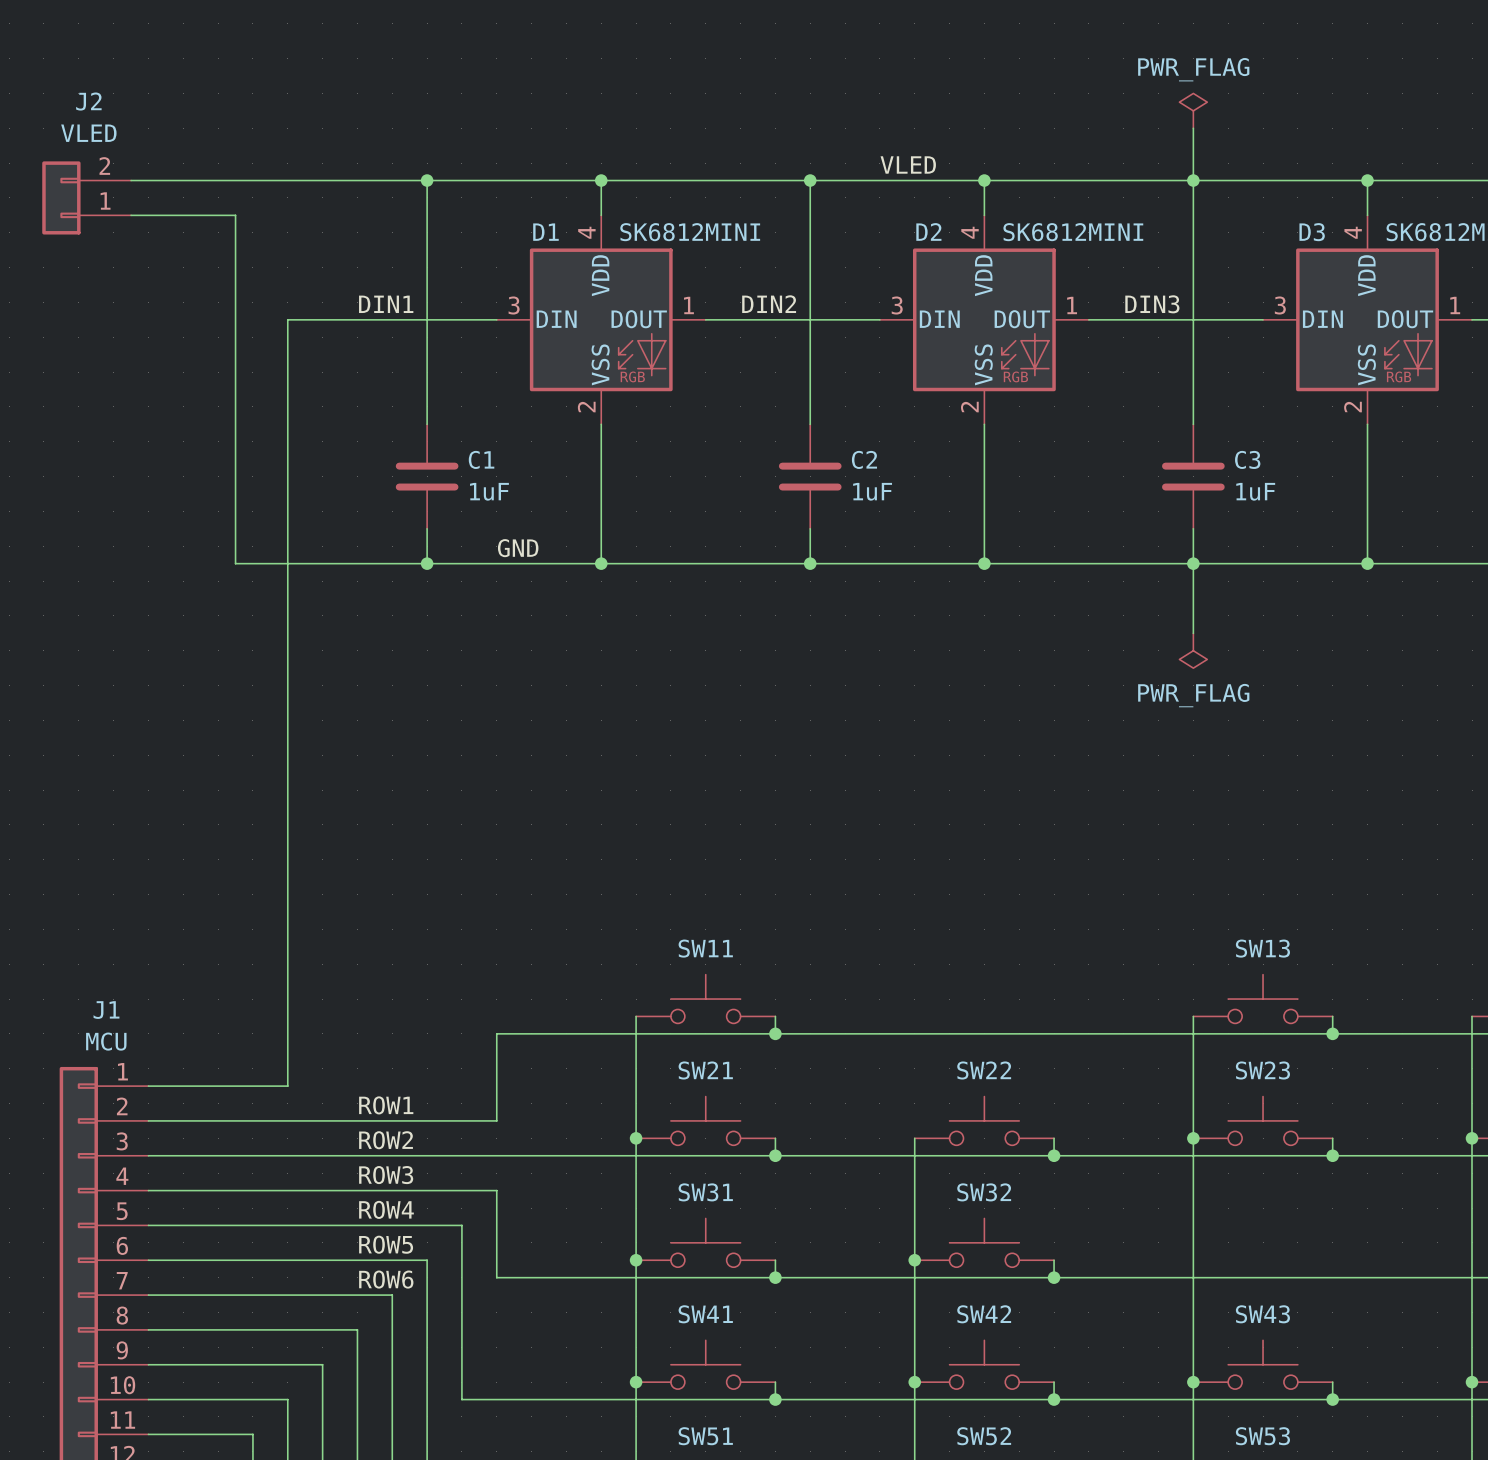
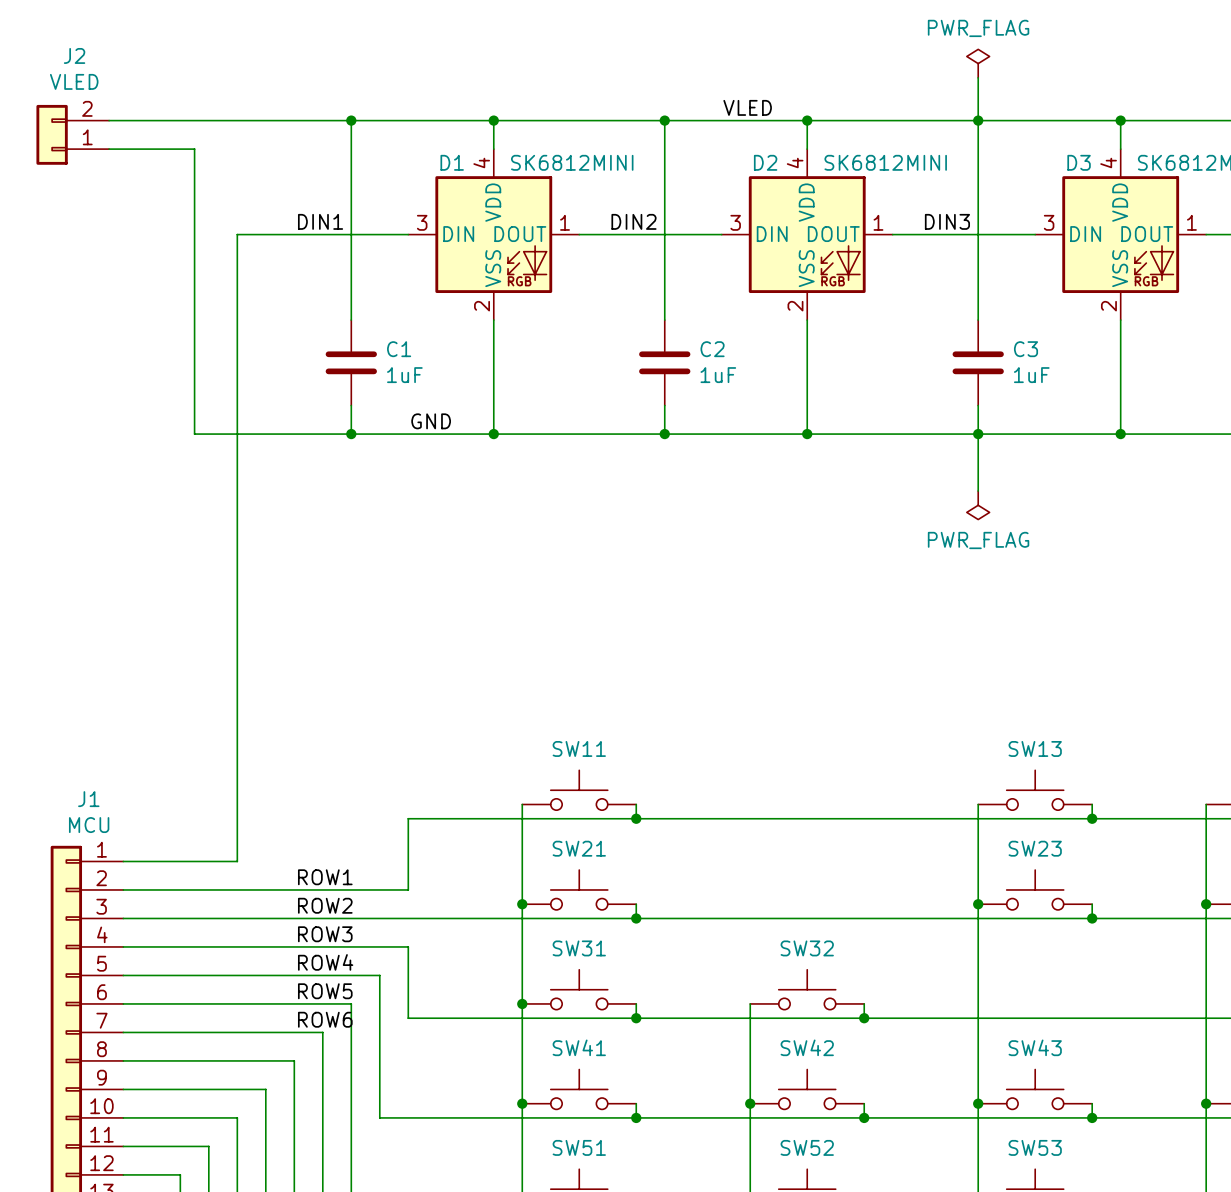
SW22: (984, 1120) -> none
wire: (914, 1138) (914, 1260) -> none
wire: (1054, 1138) (1054, 1155) -> none
junction: (1054, 1155) -> none
junction: (914, 1260) -> none

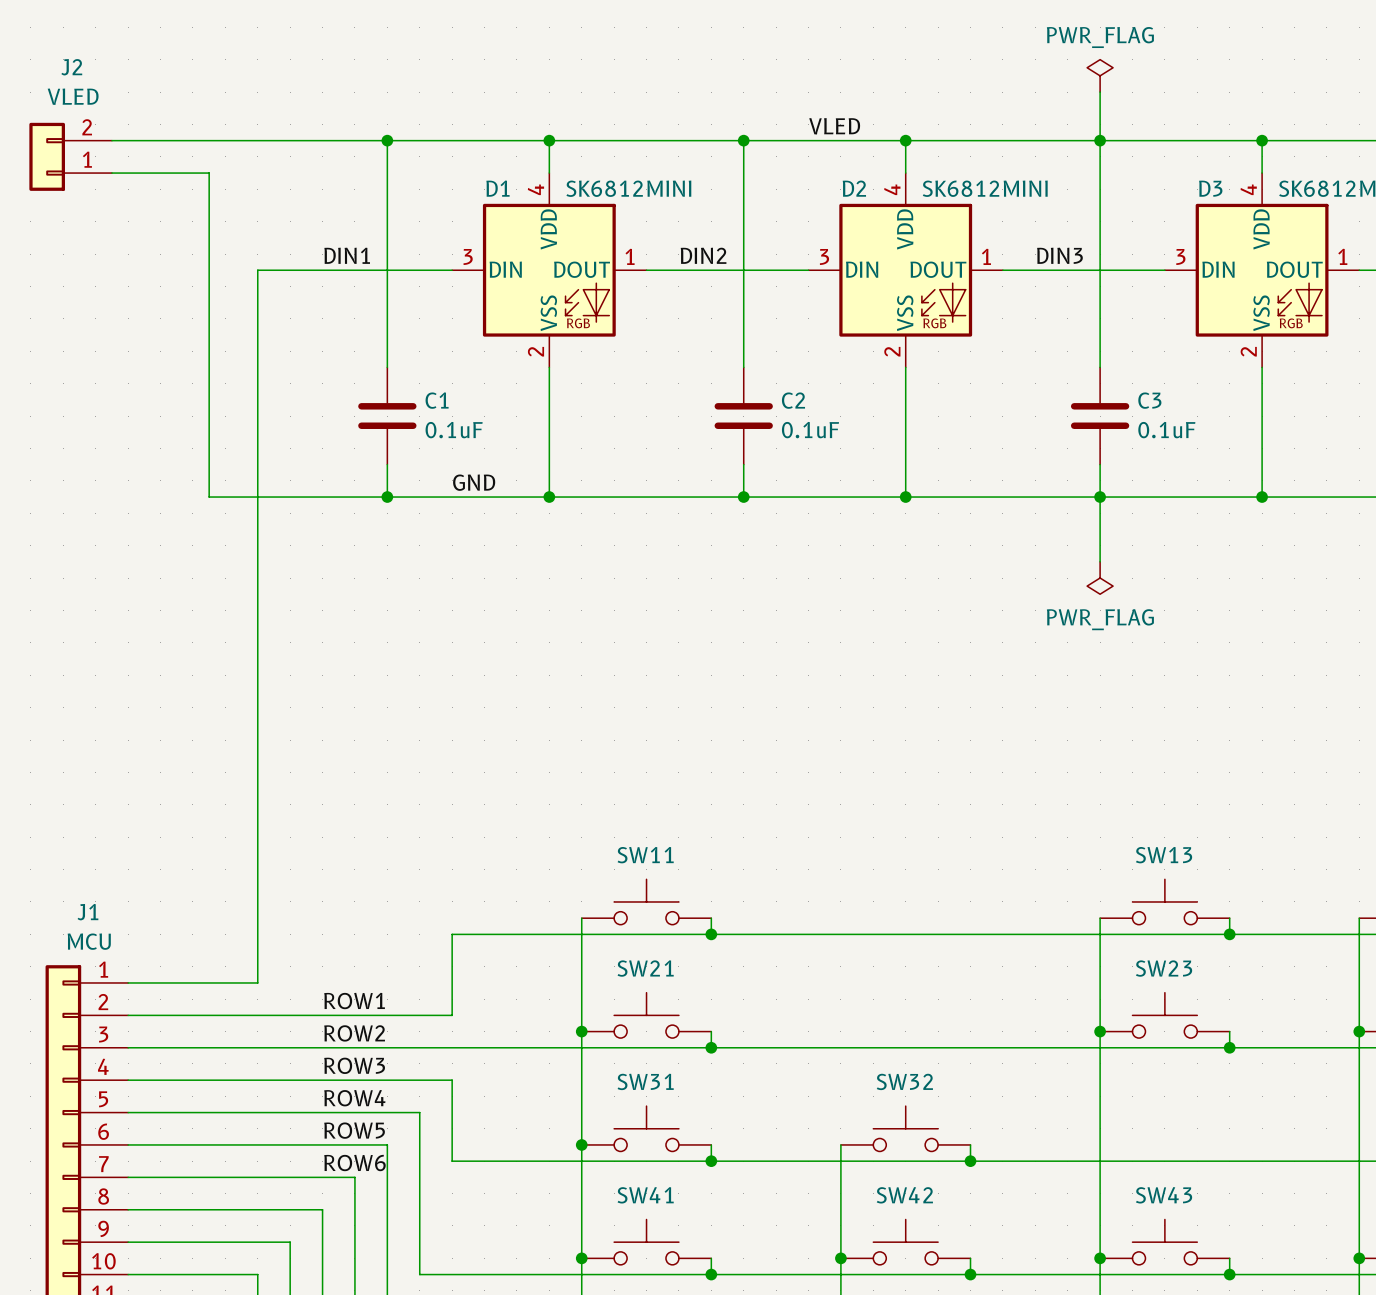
C1 value: 1uF (404, 375) -> 0.1uF (454, 430)
C2 value: 1uF (718, 375) -> 0.1uF (810, 430)
C3 value: 1uF (1031, 375) -> 0.1uF (1166, 430)

